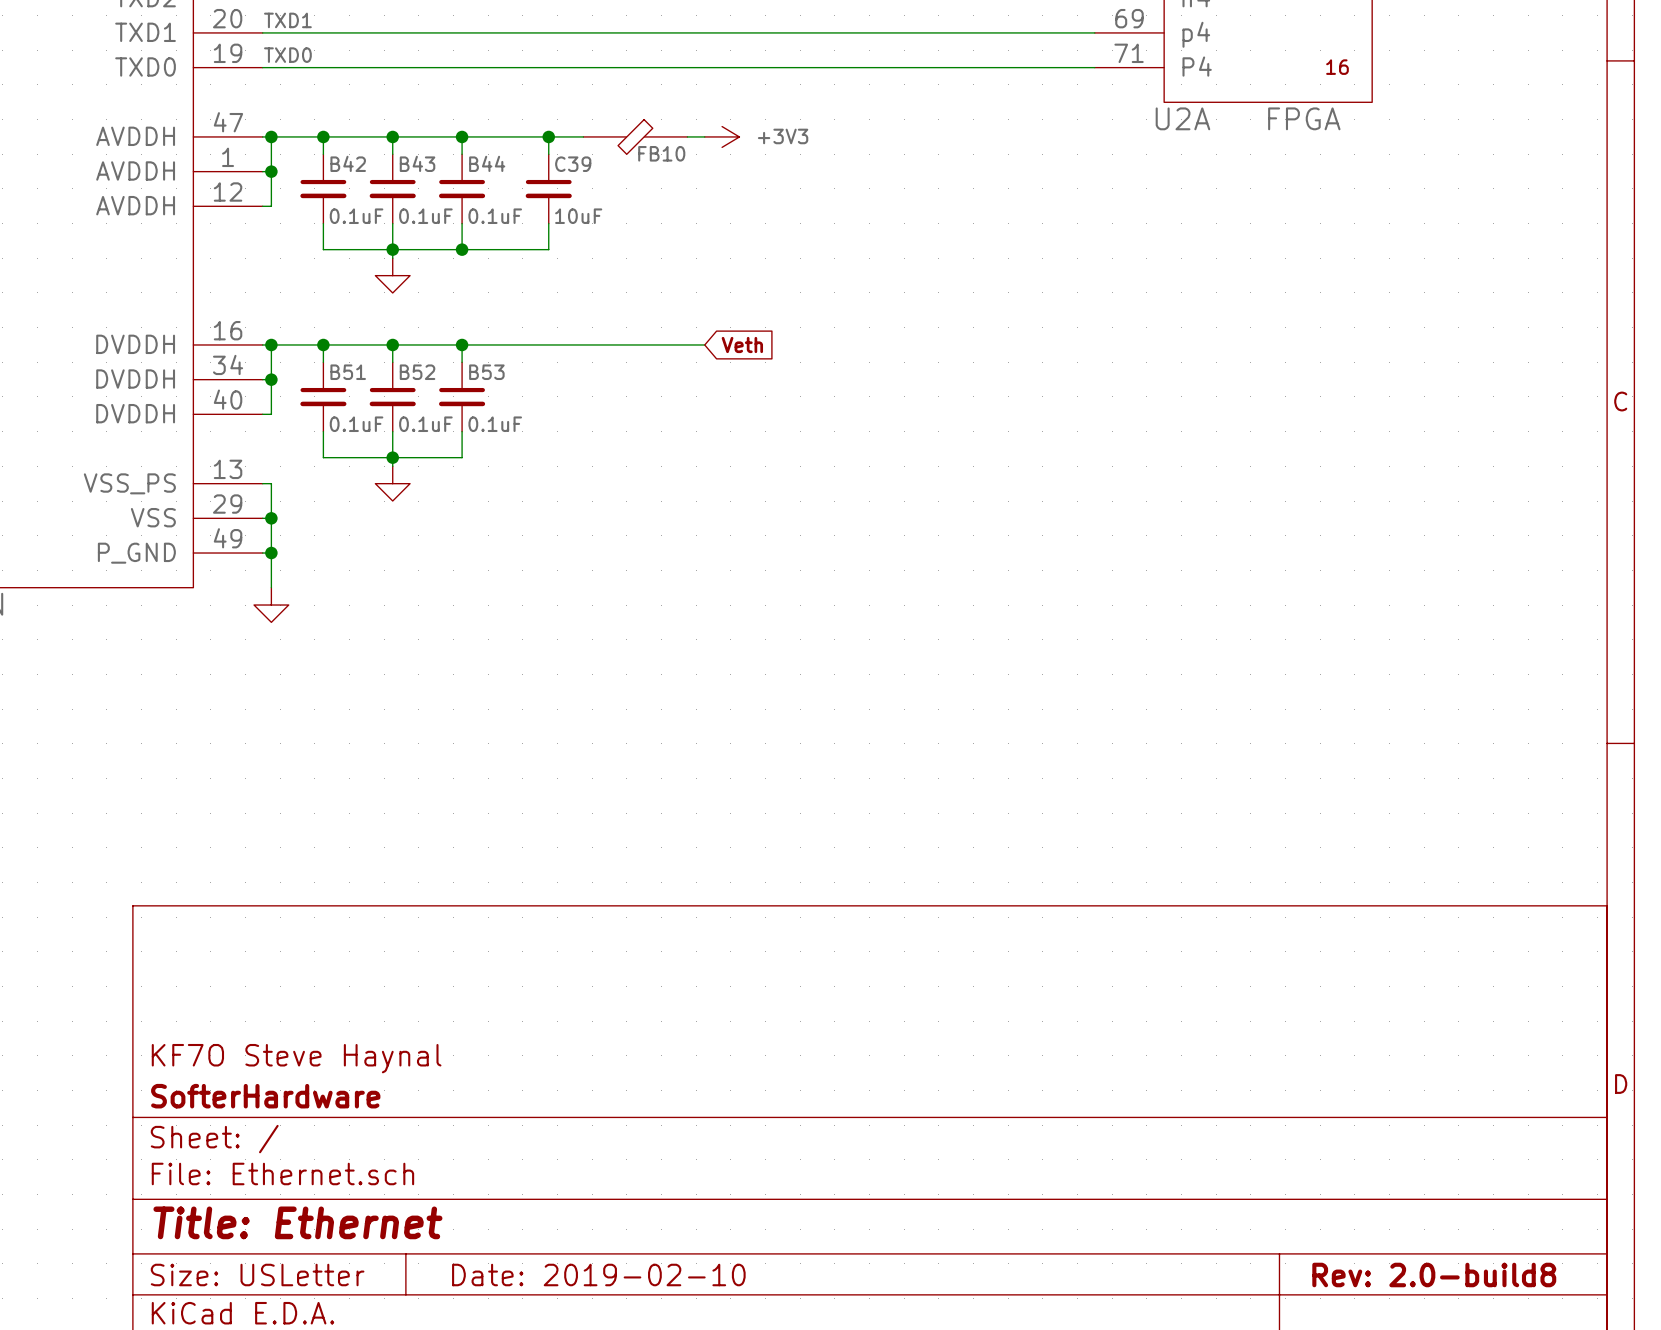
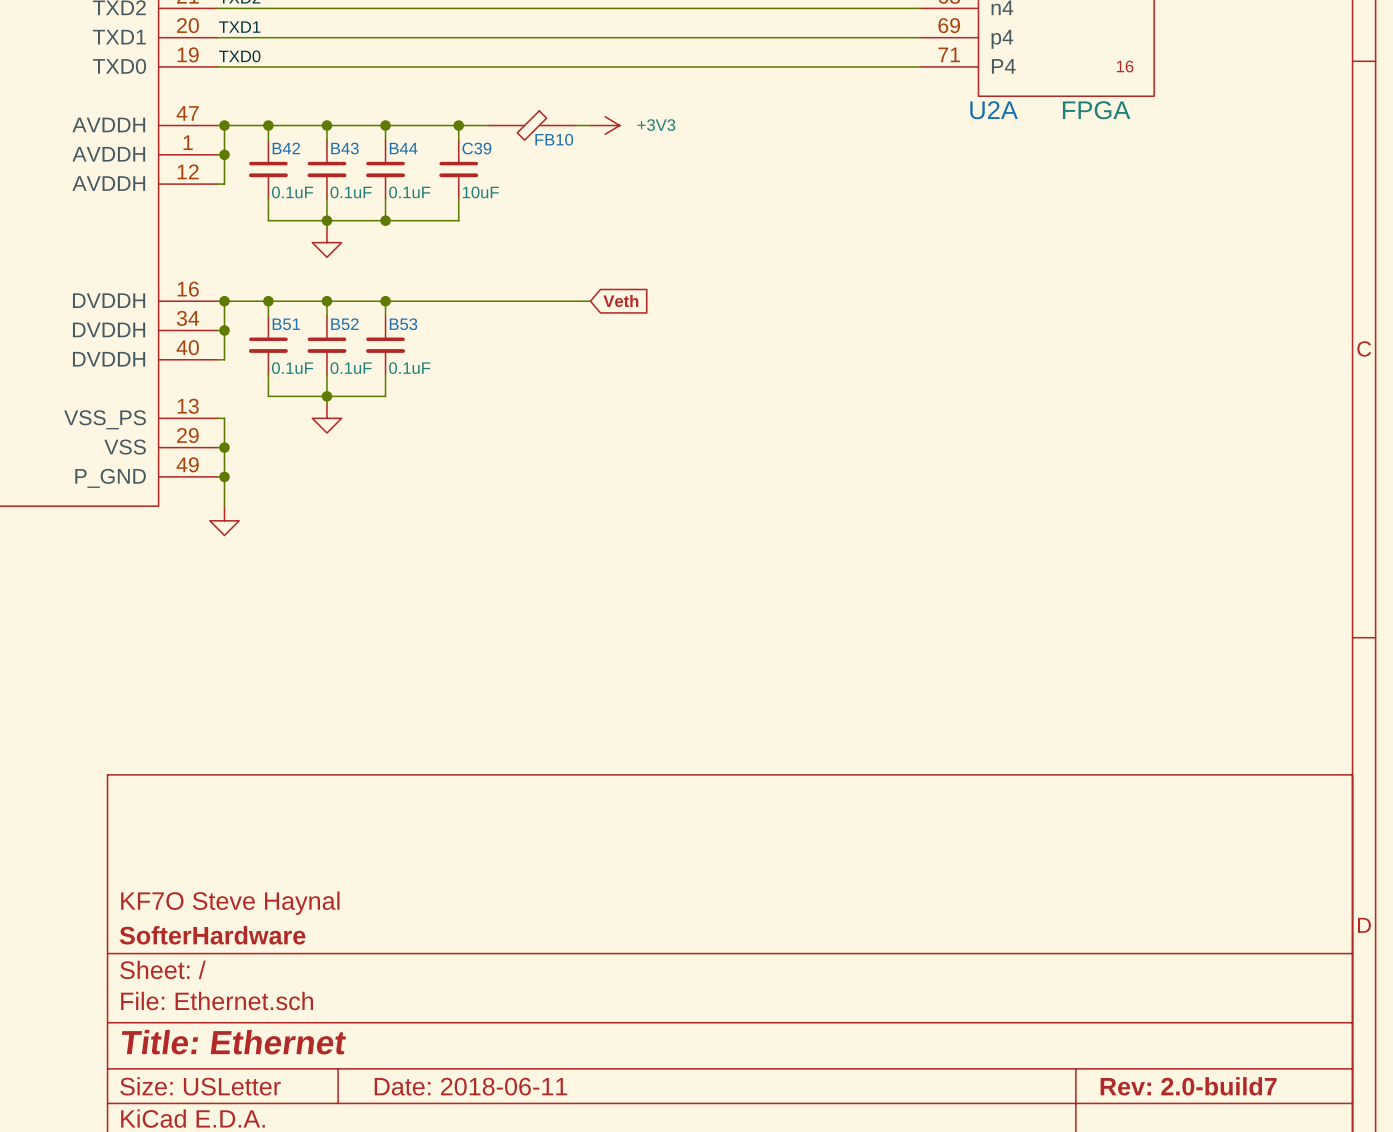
title block: Date: 2019-02-10 (598, 1274) -> Date: 2018-06-11 (470, 1086)
title block: Rev: 2.0-build8 (1434, 1274) -> Rev: 2.0-build7 (1188, 1086)

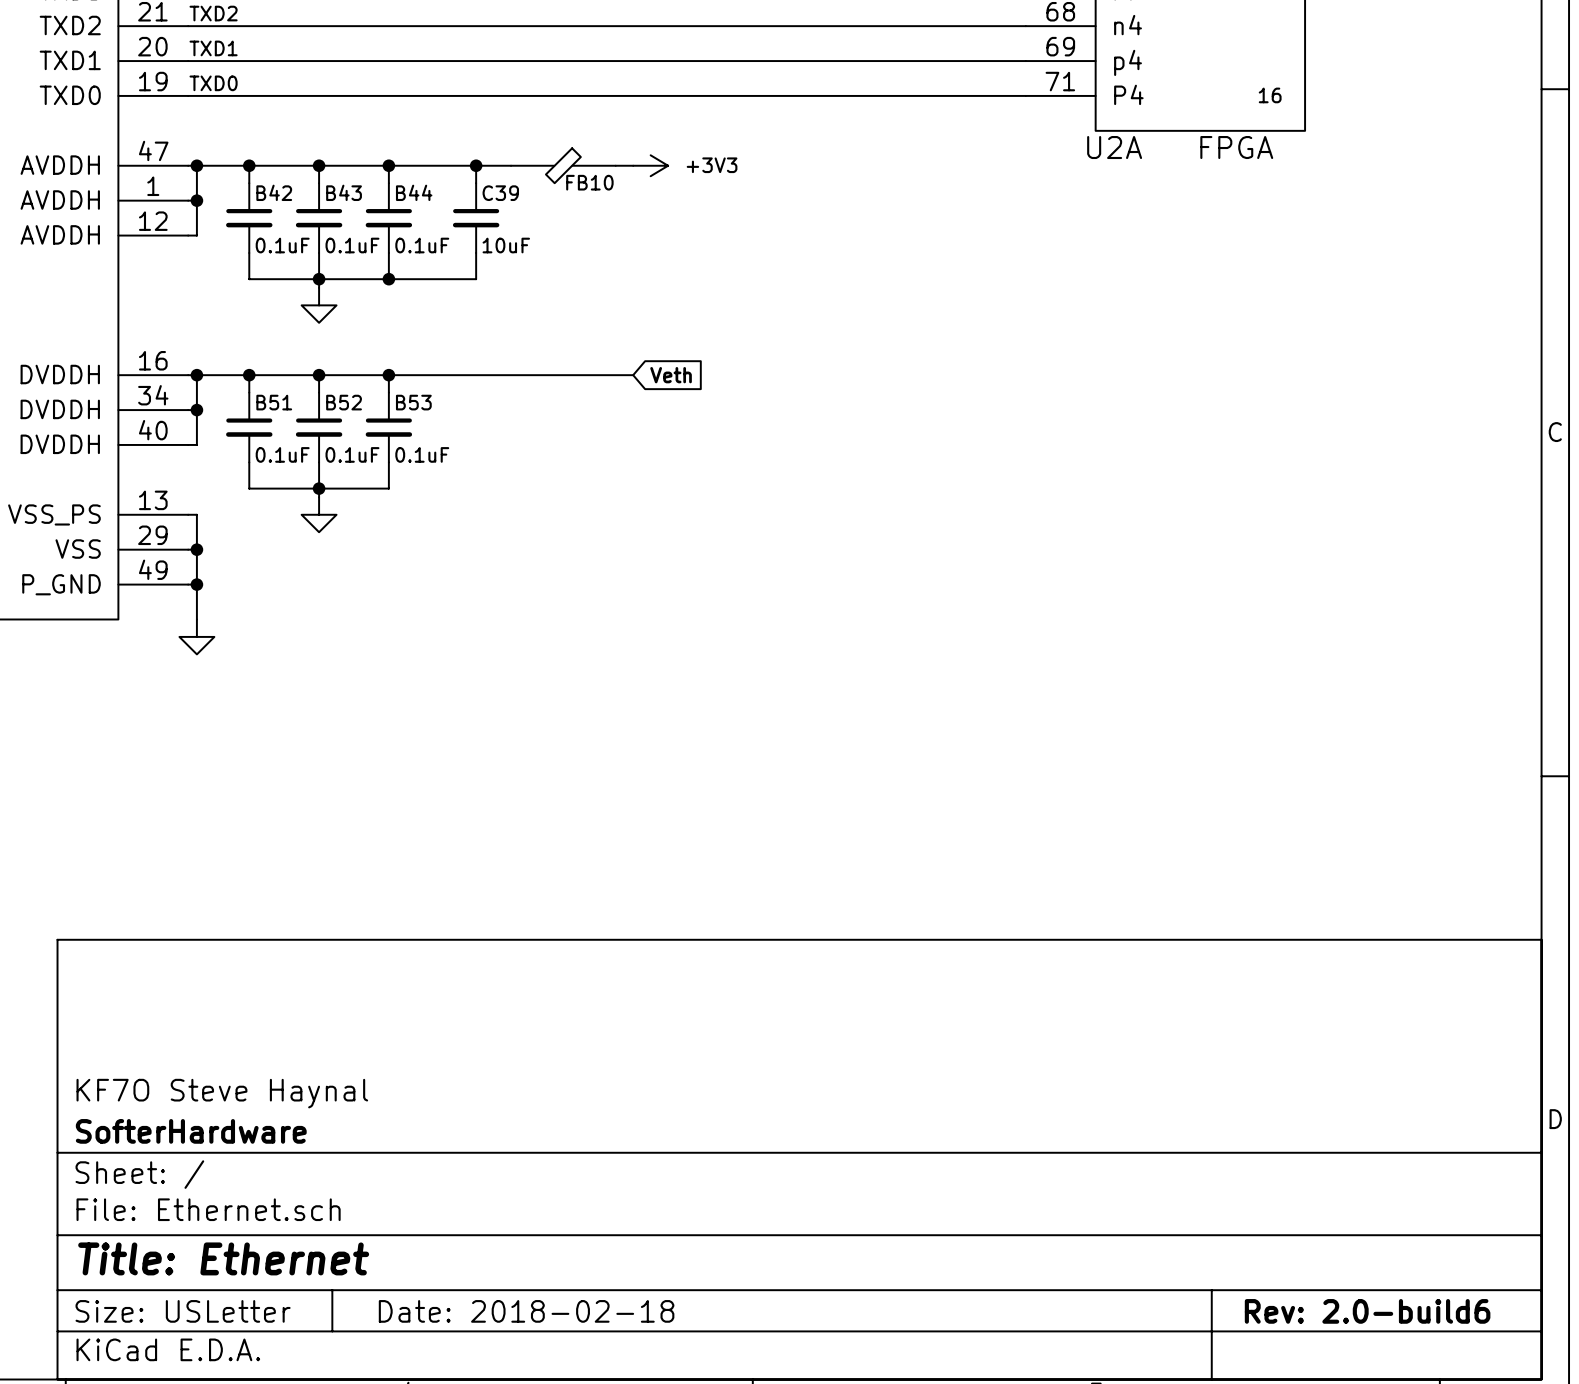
title block: Date: 2018-06-11 (470, 1086) -> Date: 2018-02-18 (526, 1311)
title block: Rev: 2.0-build7 (1188, 1086) -> Rev: 2.0-build6 (1367, 1311)

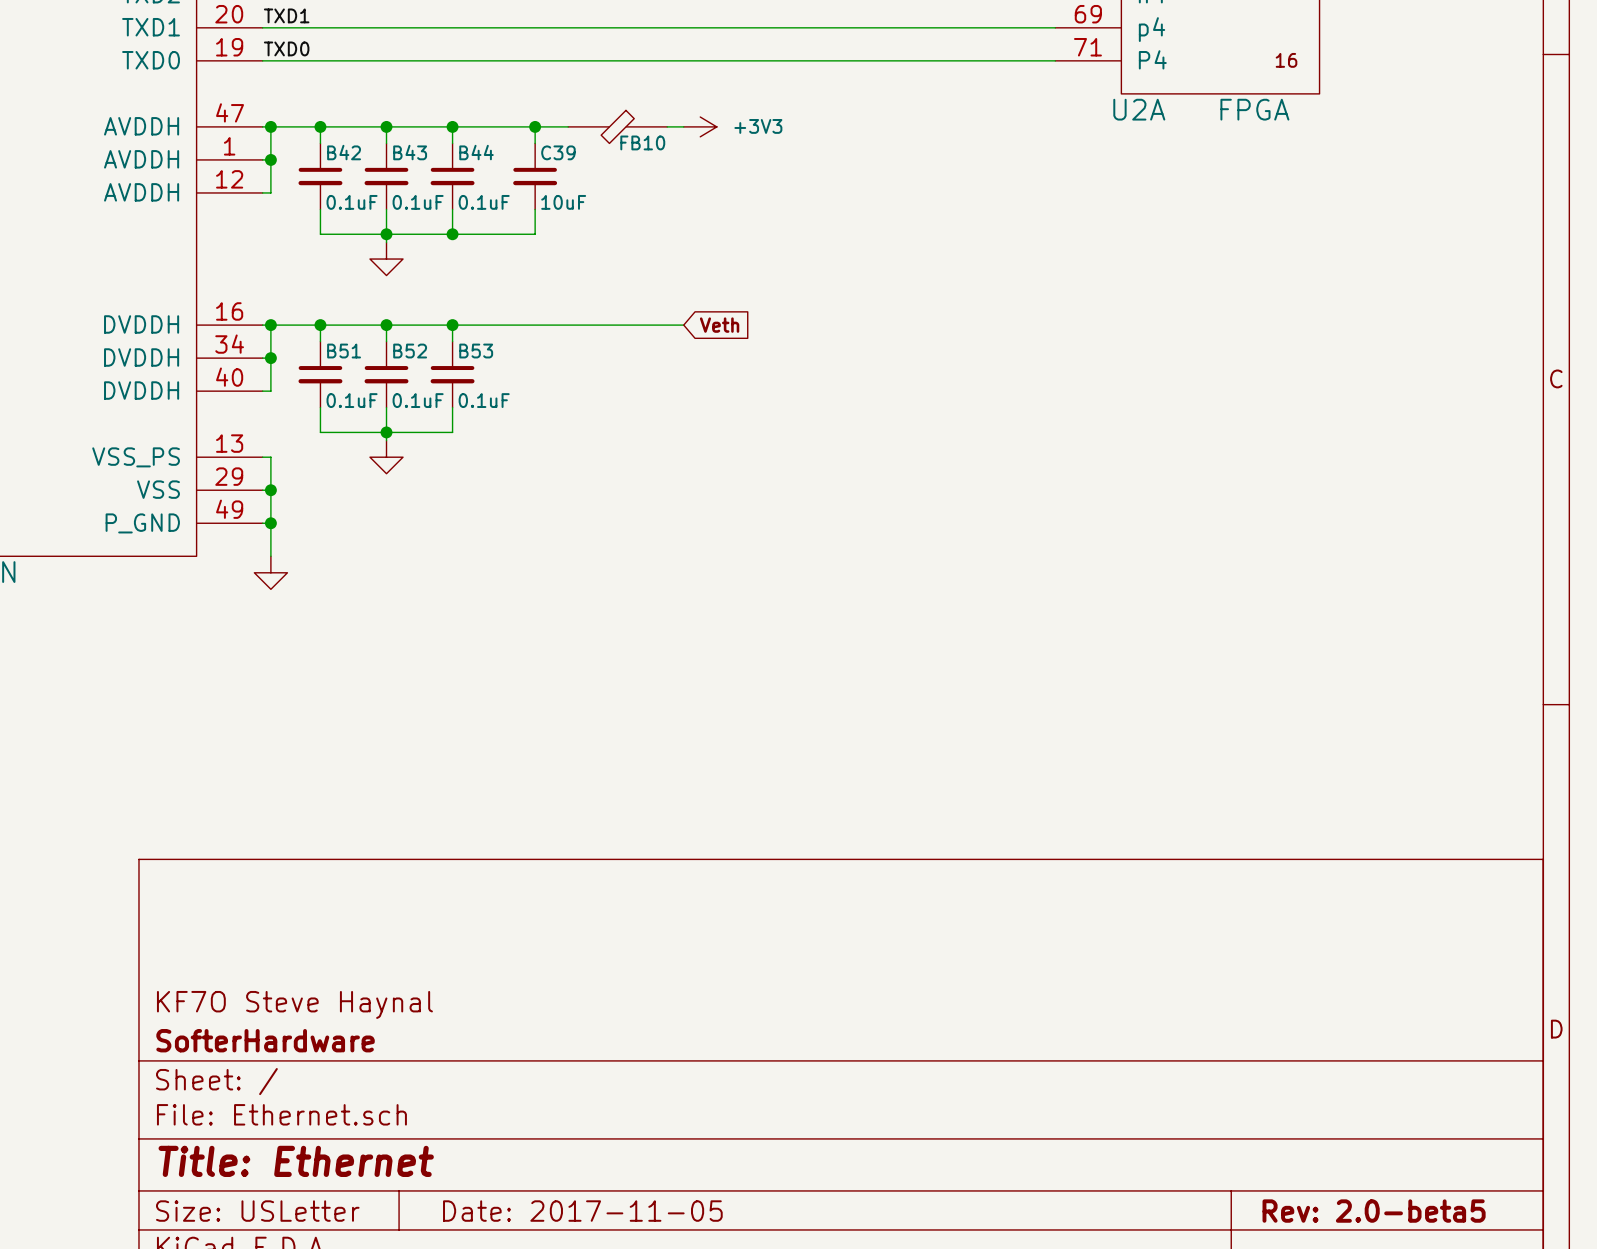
title block: Date: 2018-02-18 (526, 1311) -> Date: 2017-11-05 (582, 1211)
title block: Rev: 2.0-build6 (1367, 1311) -> Rev: 2.0-beta5 (1374, 1211)

